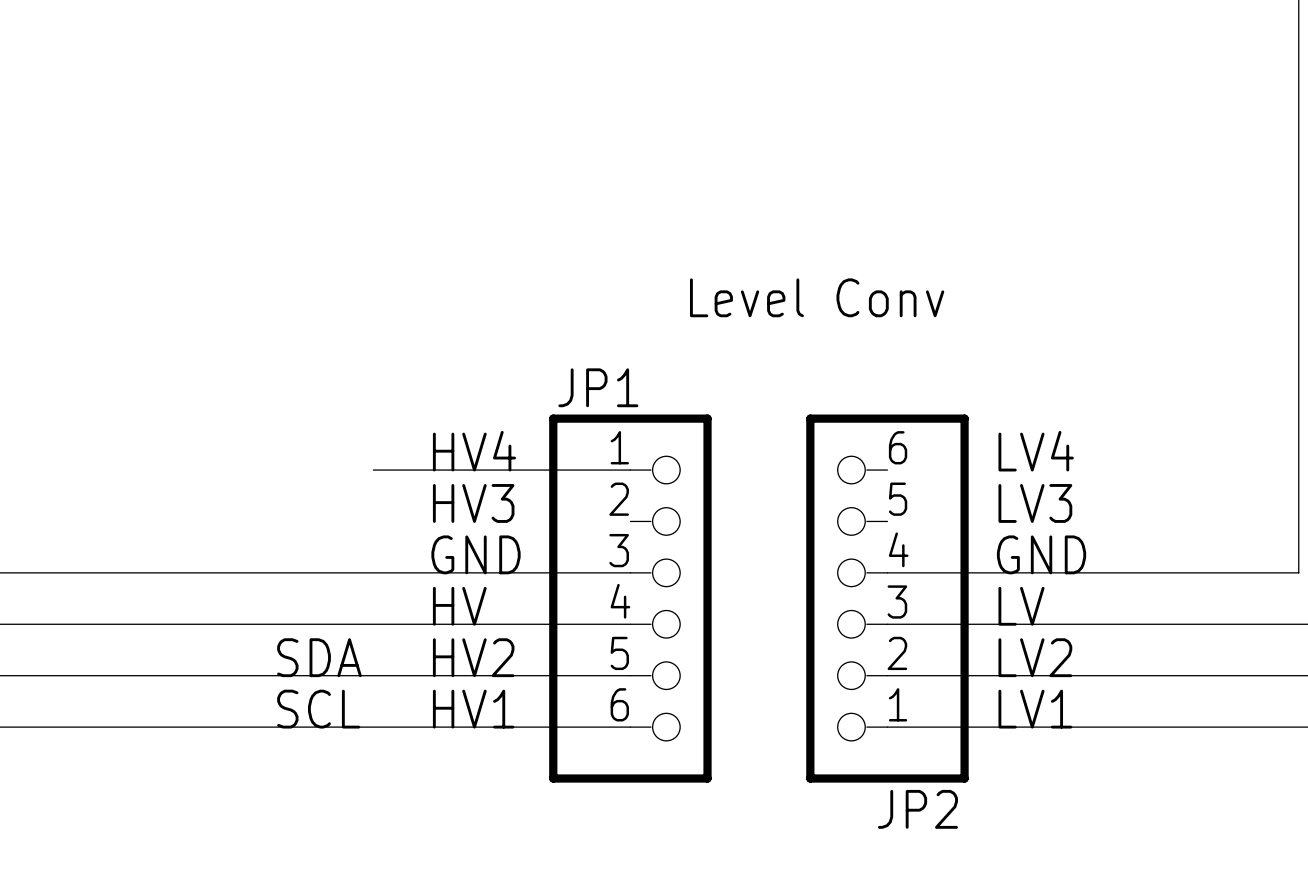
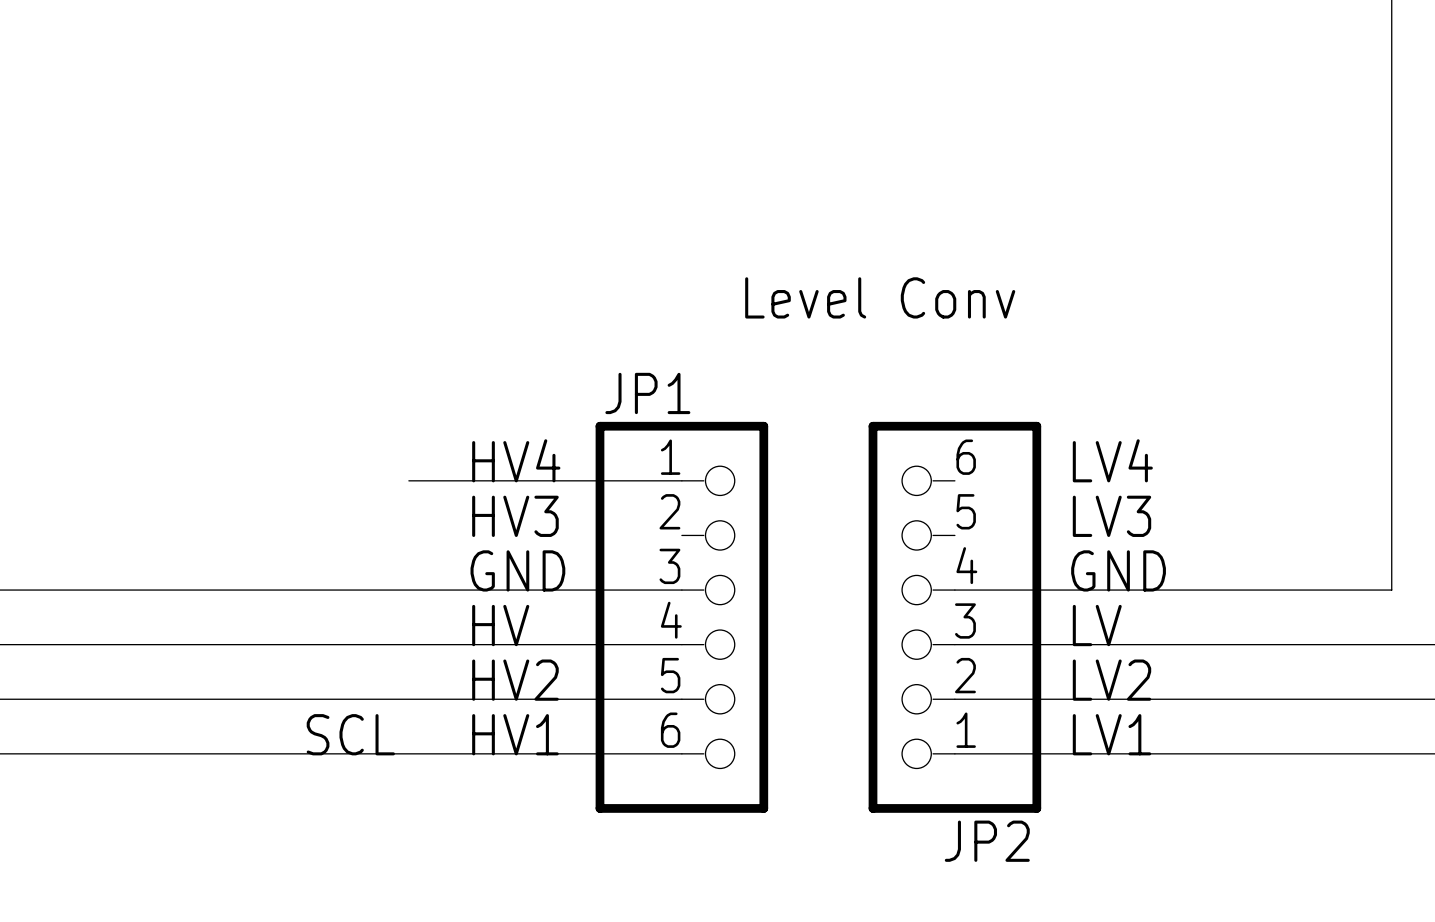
text: SDA (319, 657) -> none

